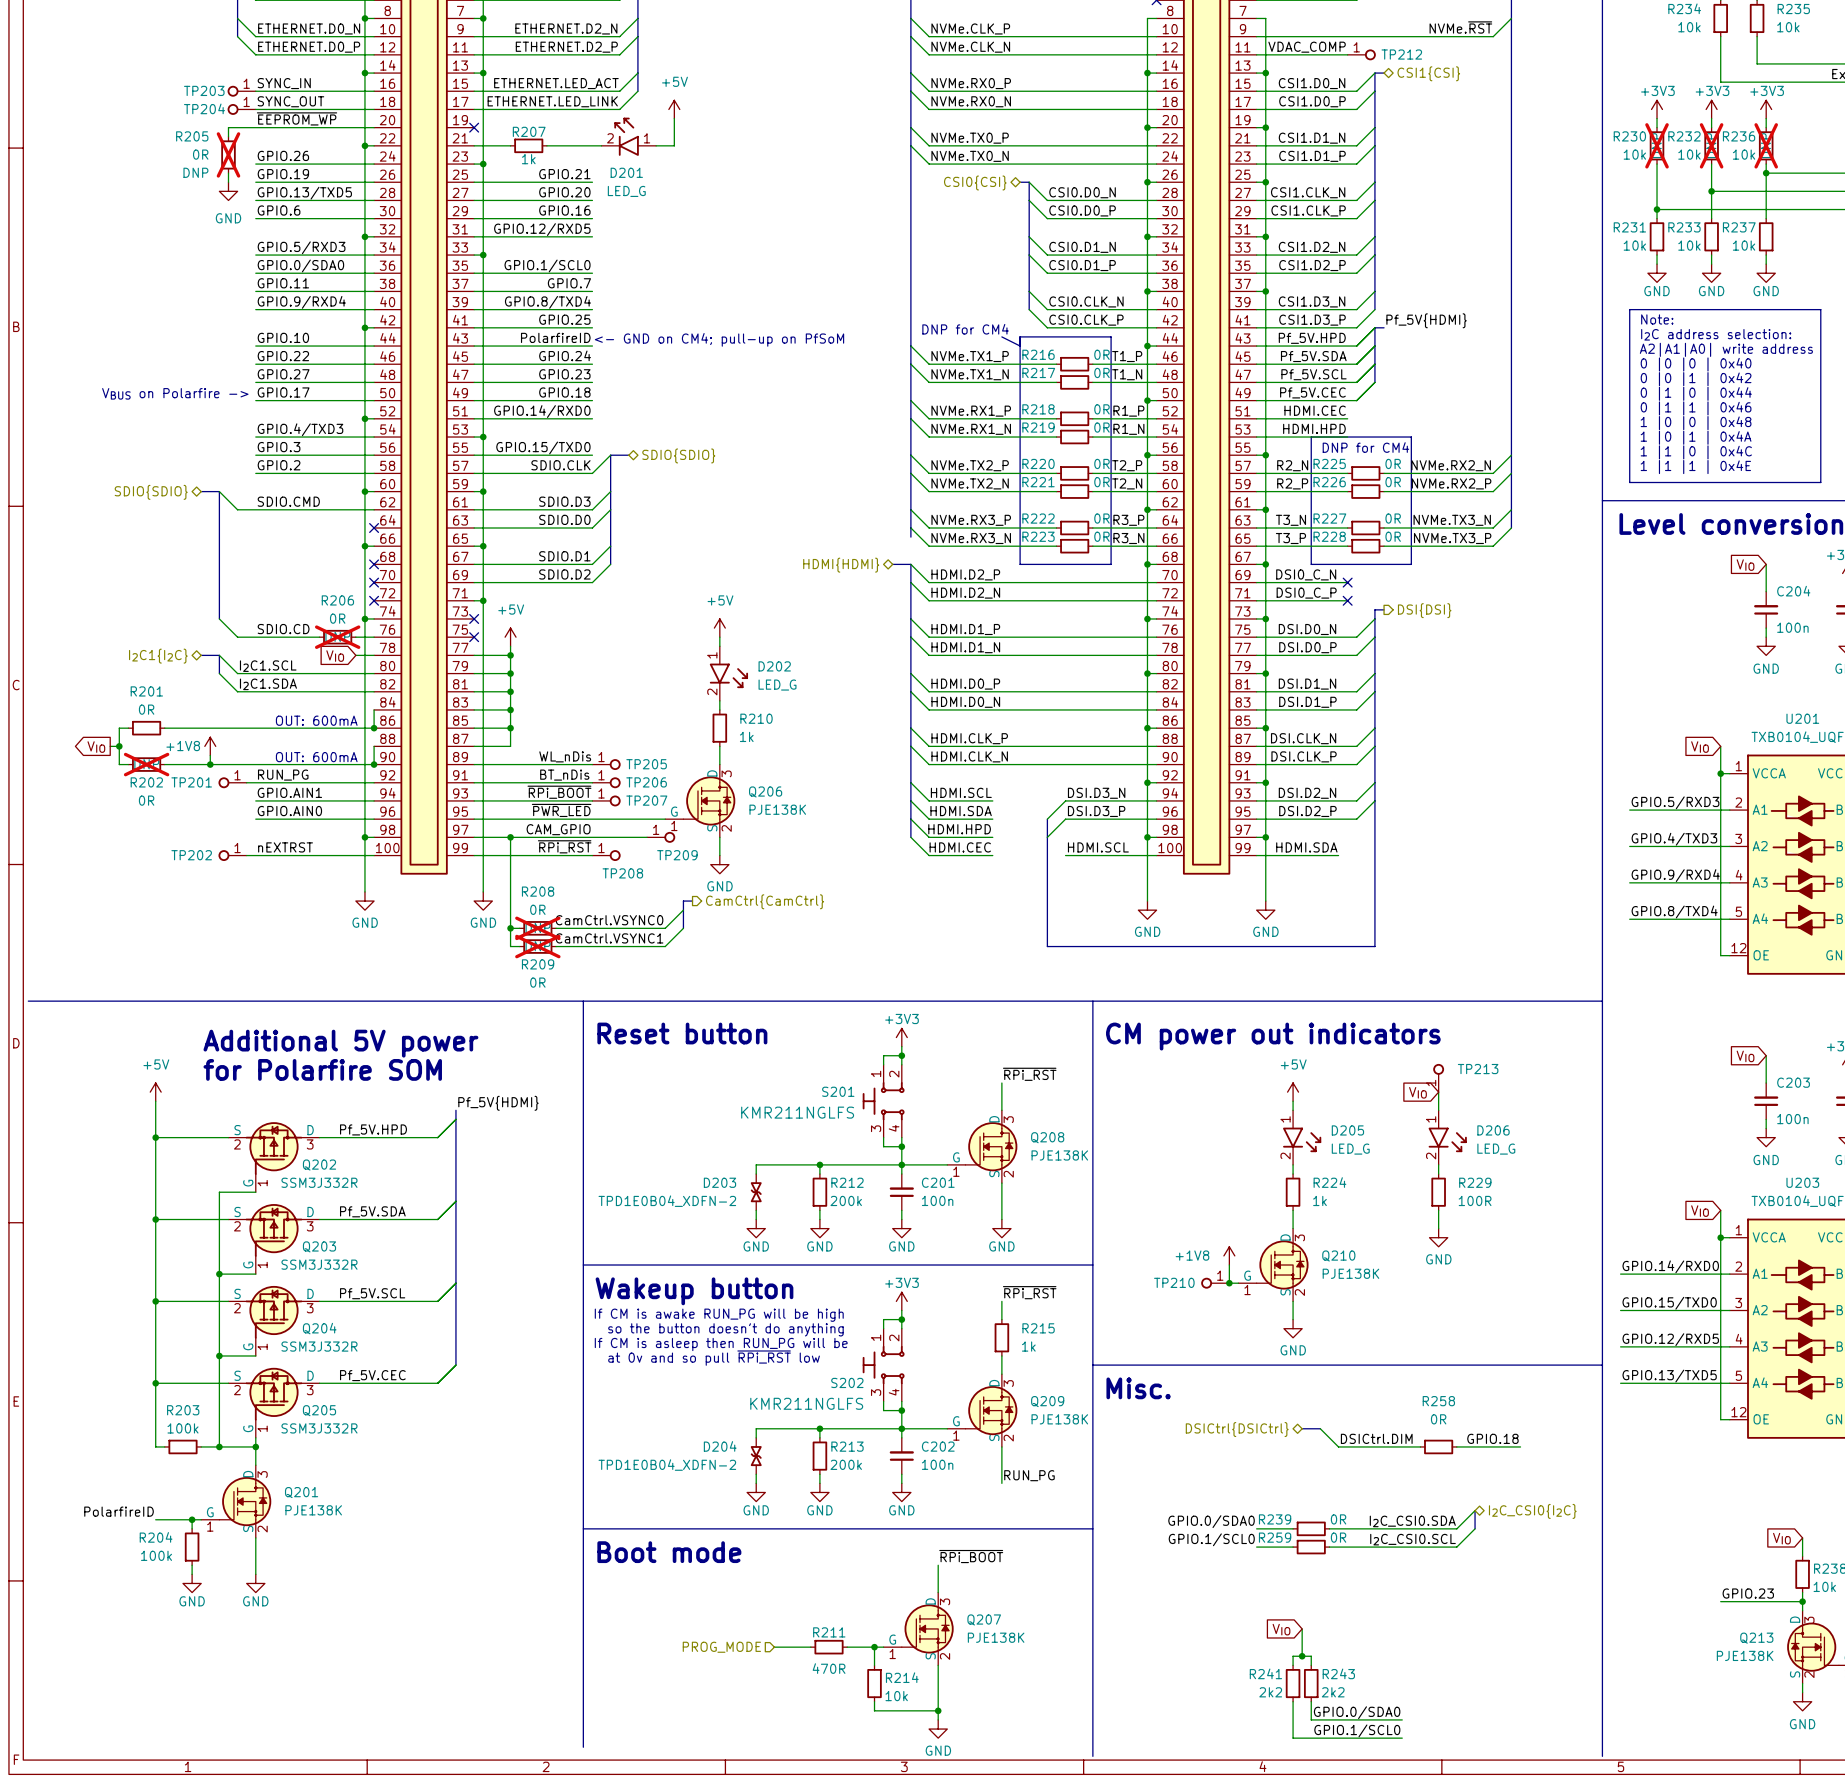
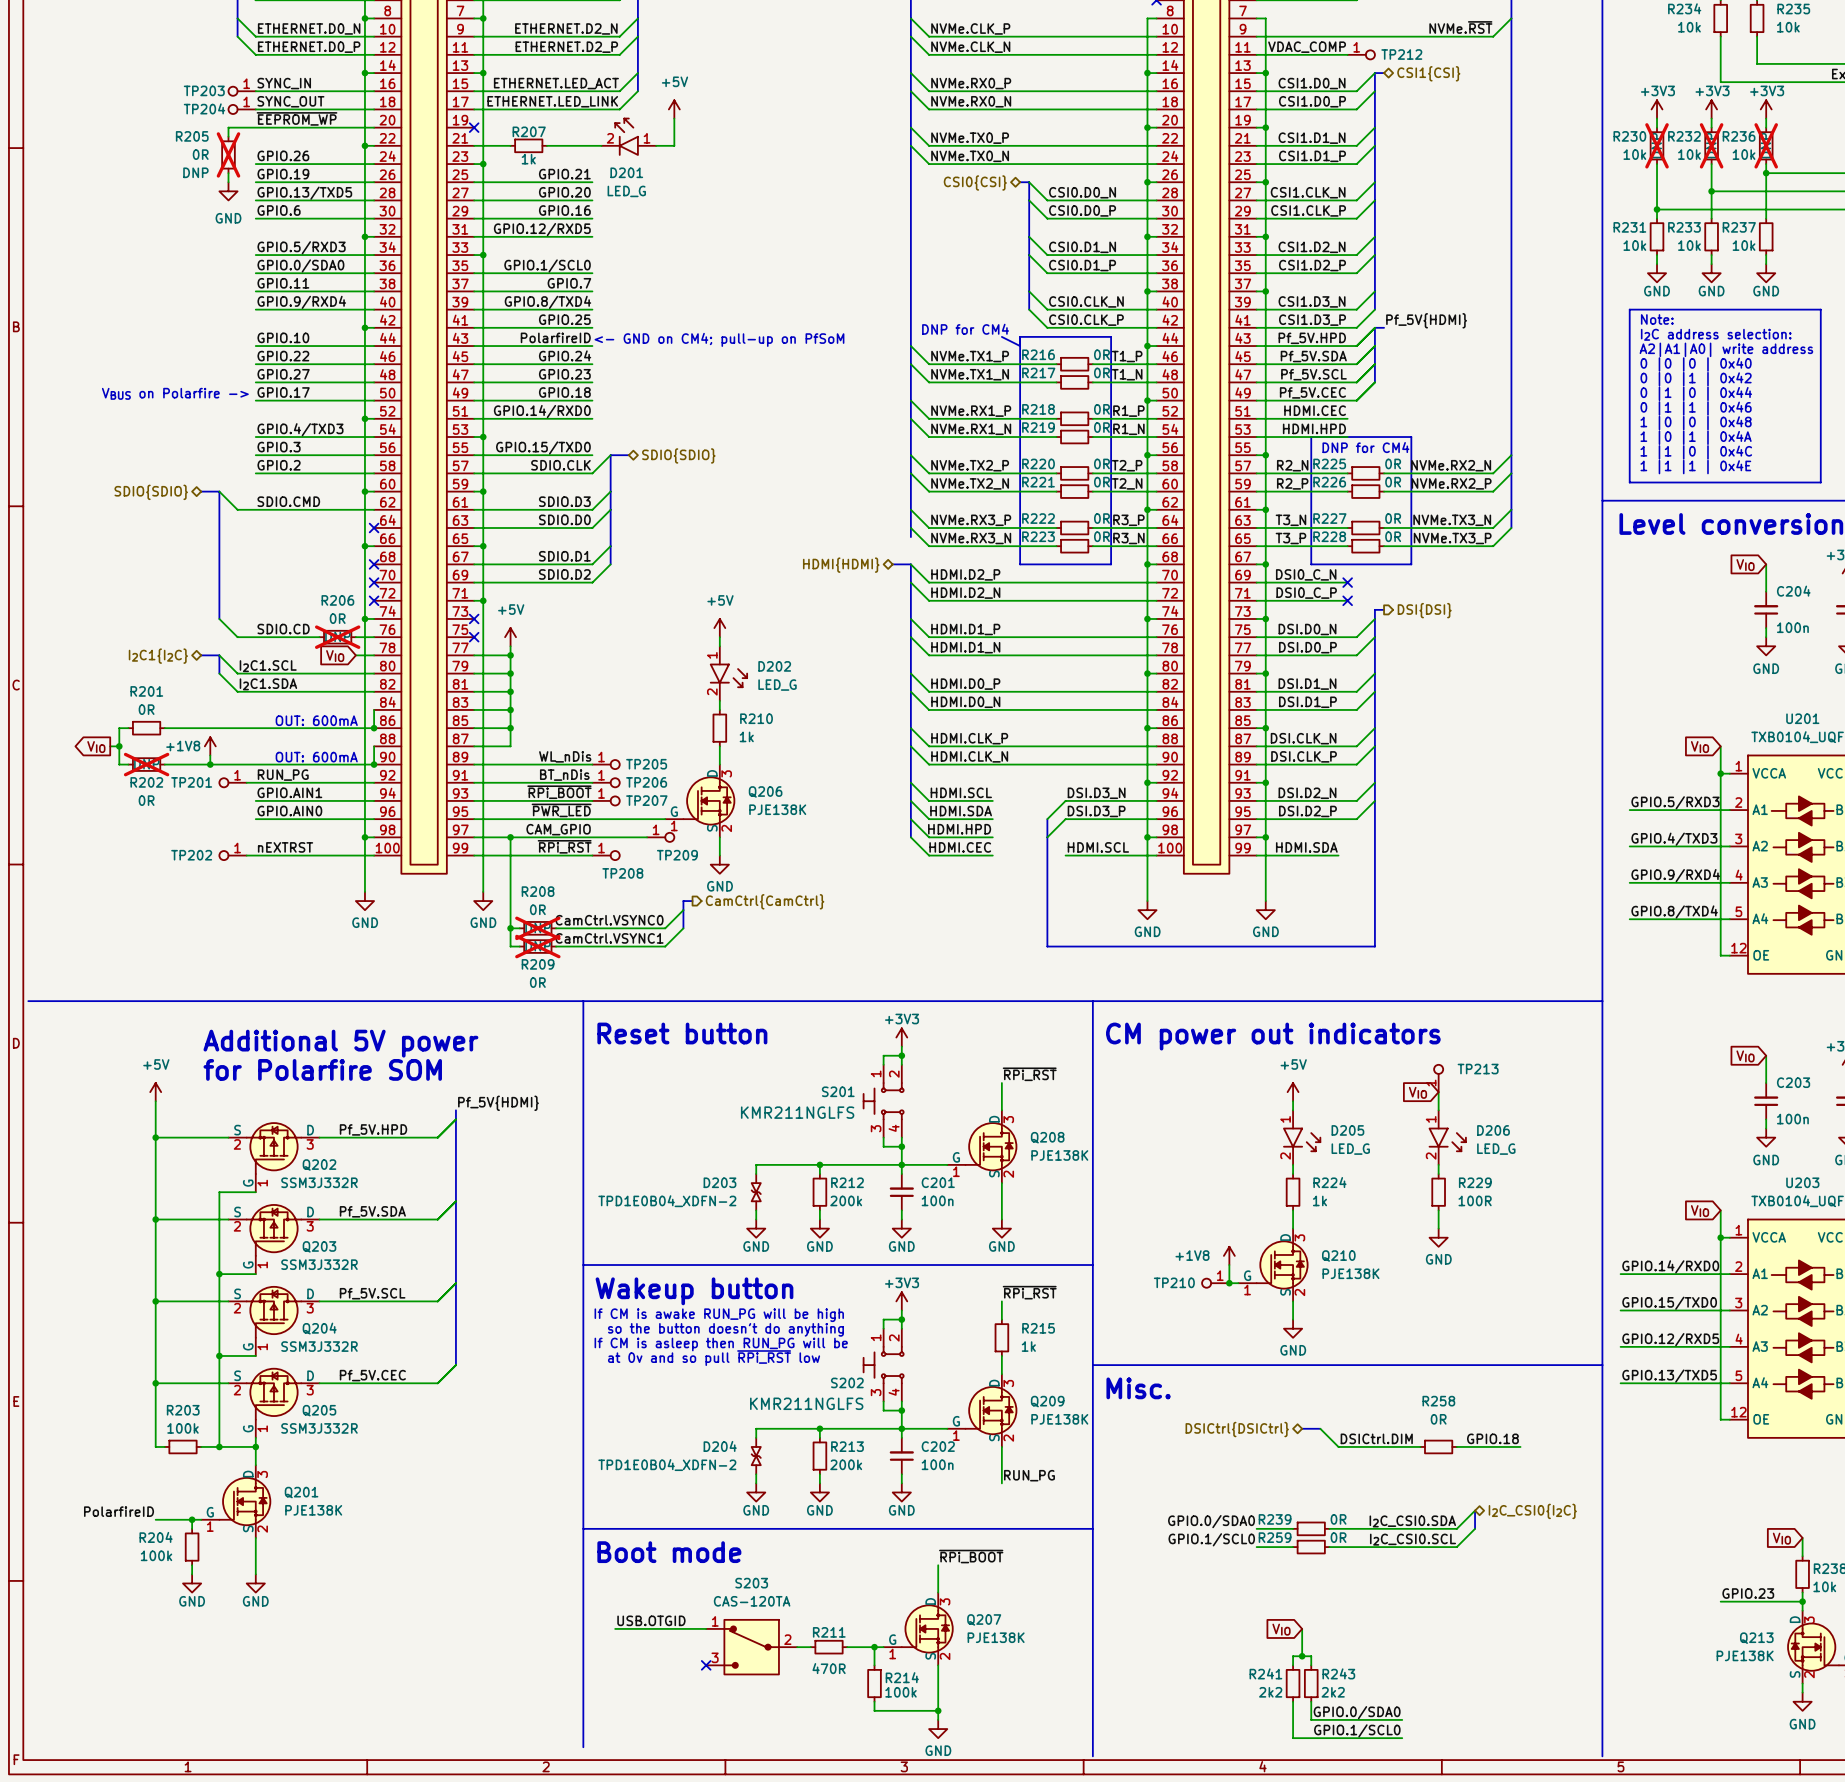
label: none -> USB.OTGID (651, 1620)
wire: none -> (615, 1628) (706, 1628)
hierarchical label: PROG_MODE (721, 1647) -> none
S203: none -> CAS-120TA (751, 1647)
no-connect mark: none -> (706, 1665)
R214 text: 10k (896, 1696) -> 100k (900, 1692)

